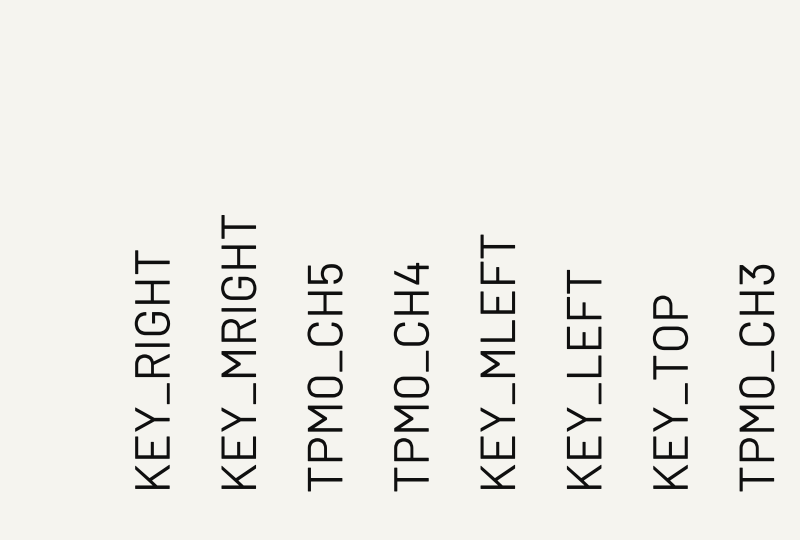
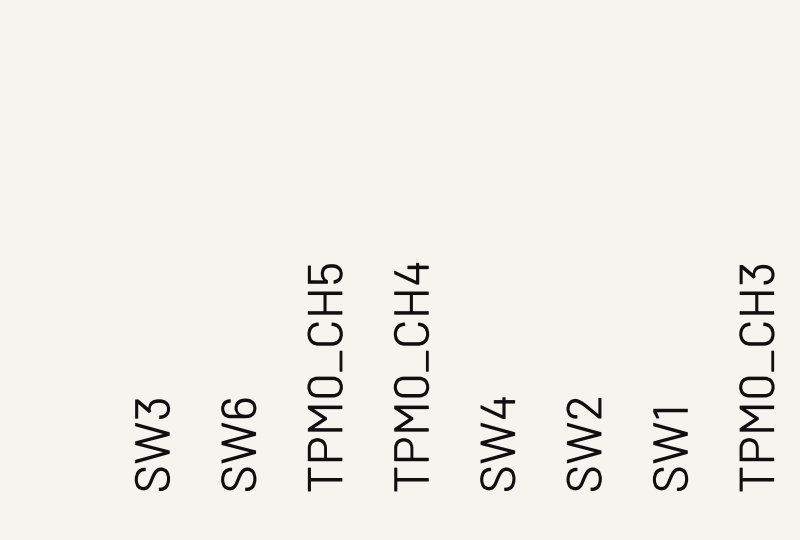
label: KEY_MRIGHT (238, 351) -> SW6 (238, 444)
label: KEY_MLEFT (497, 361) -> SW4 (497, 444)
label: KEY_RIGHT (152, 369) -> SW3 (152, 445)
label: KEY_LEFT (584, 379) -> SW2 (584, 444)
label: KEY_TOP (670, 392) -> SW1 (670, 449)

